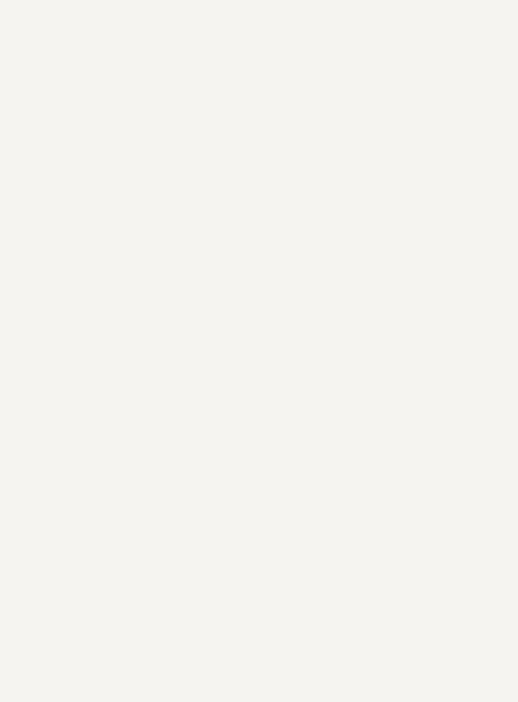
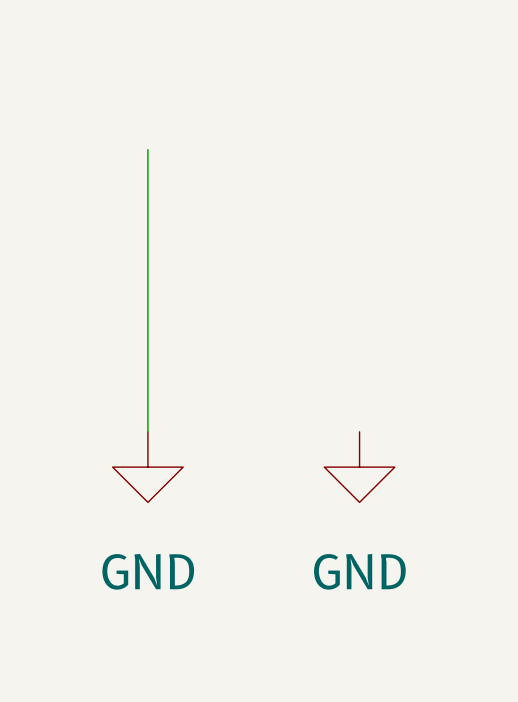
wire: none -> (147, 149) (147, 431)
power symbol: none -> GND (147, 467)
power symbol: none -> GND (359, 467)

